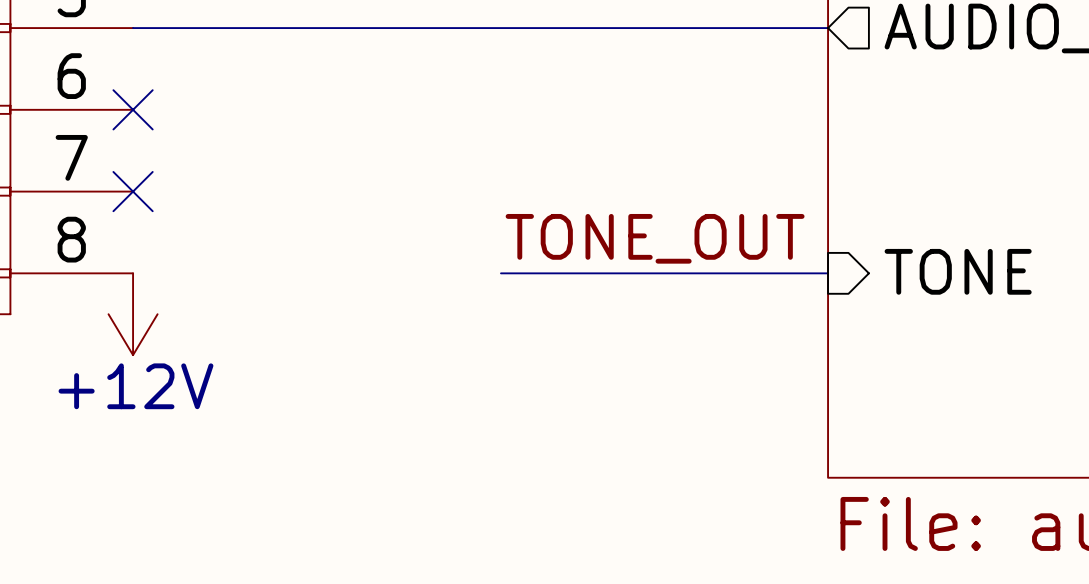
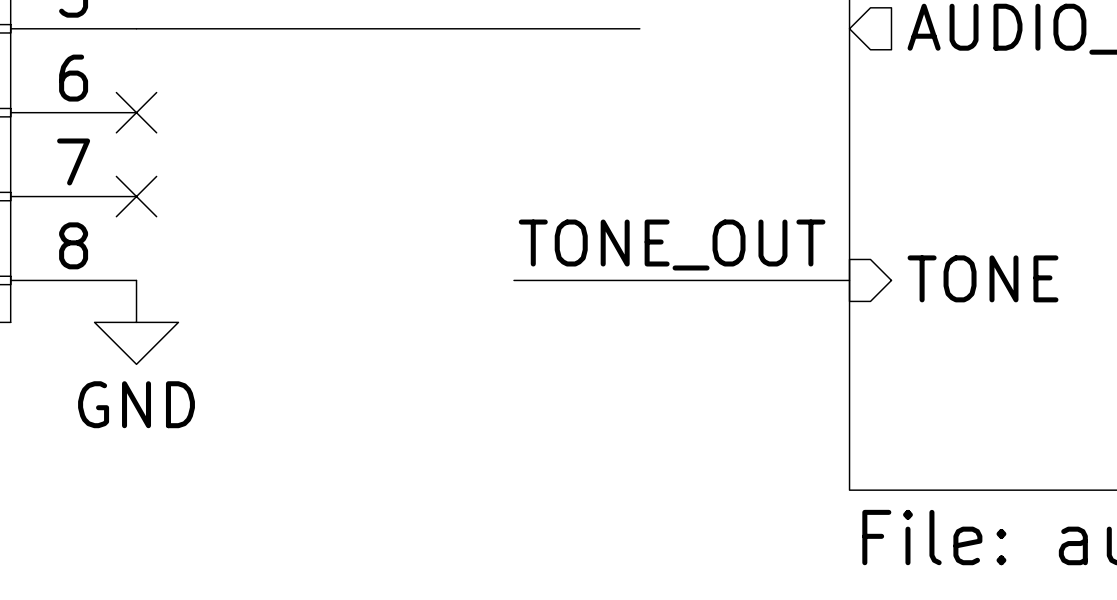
wire: (623, 28) (828, 28) -> none
power symbol: +12V (133, 314) -> GND (136, 322)

